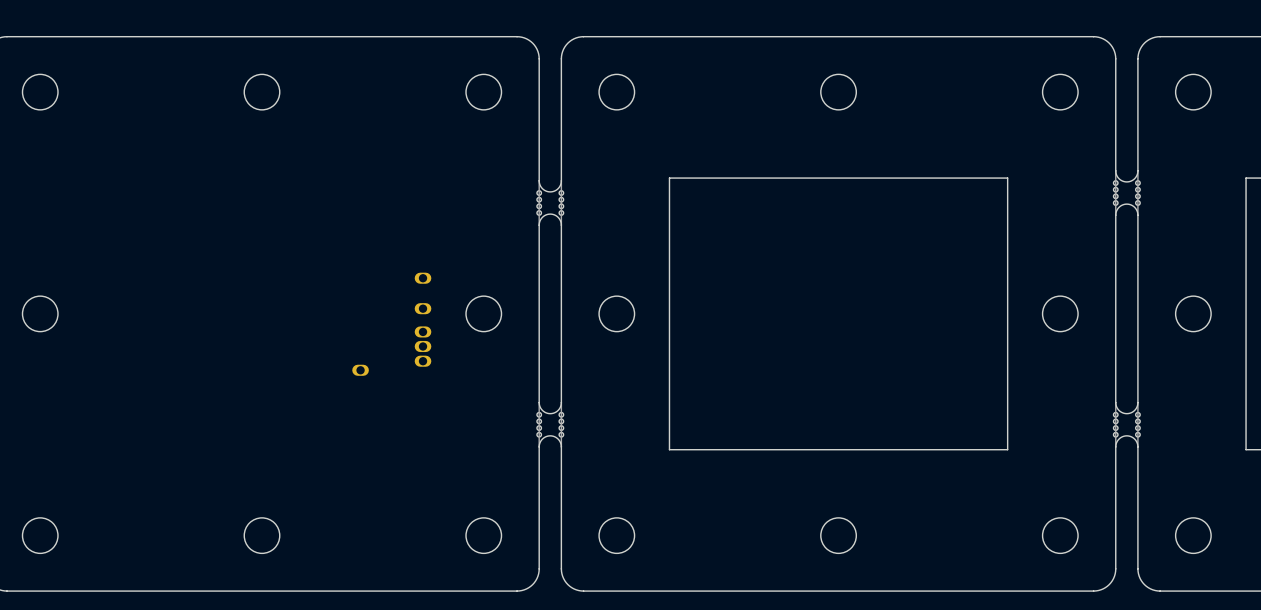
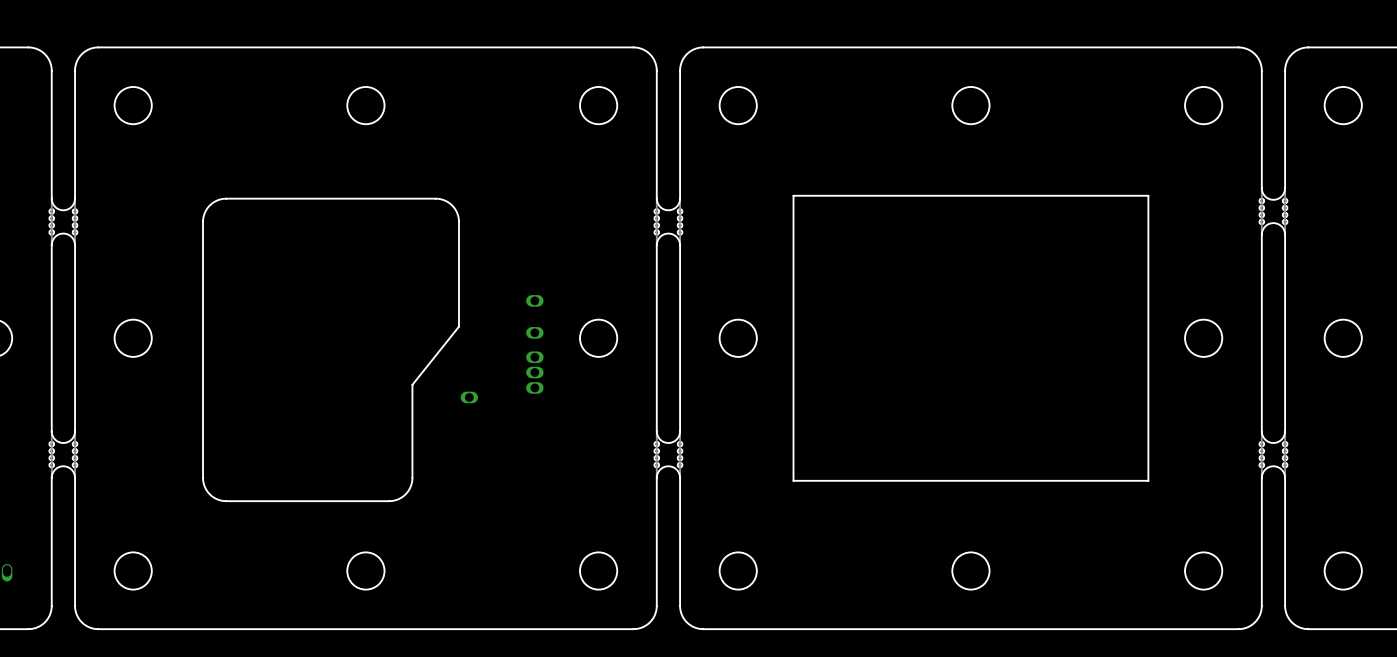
board edge: none -> (435, 198) (226, 198) (216, 200) (208, 207) (203, 221) (203, 477) (205, 488) (211, 496) (226, 501) (389, 501) (399, 498) (407, 492) (412, 477) (412, 384) (458, 326) (458, 216) (450, 203) (435, 198)

